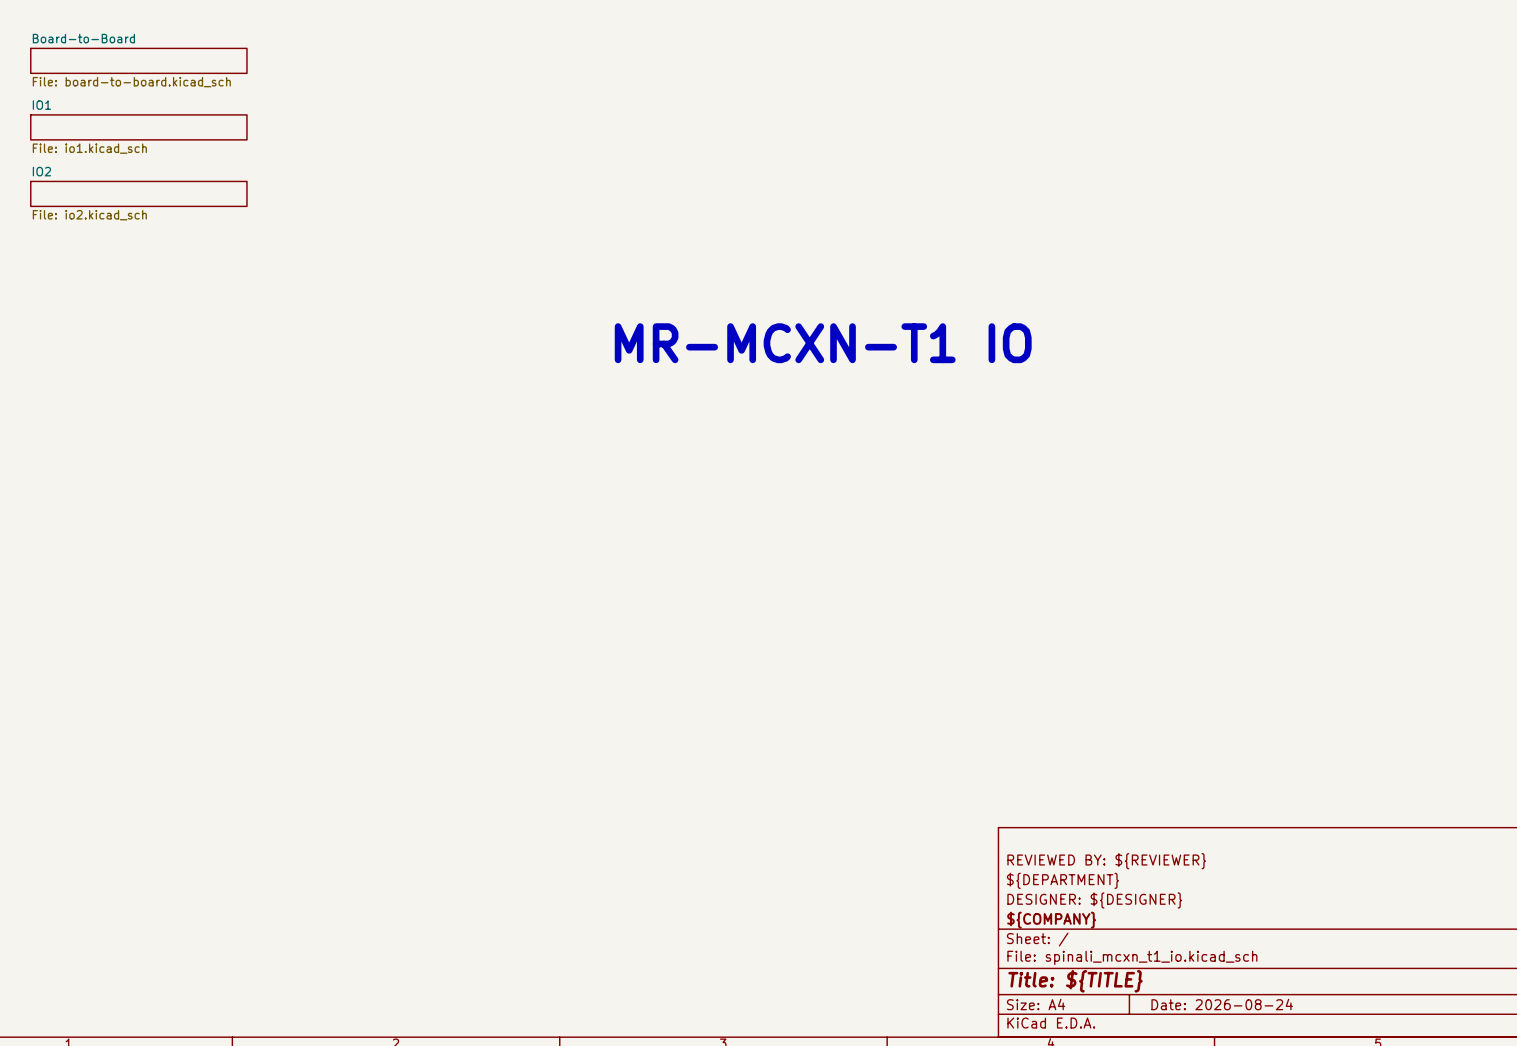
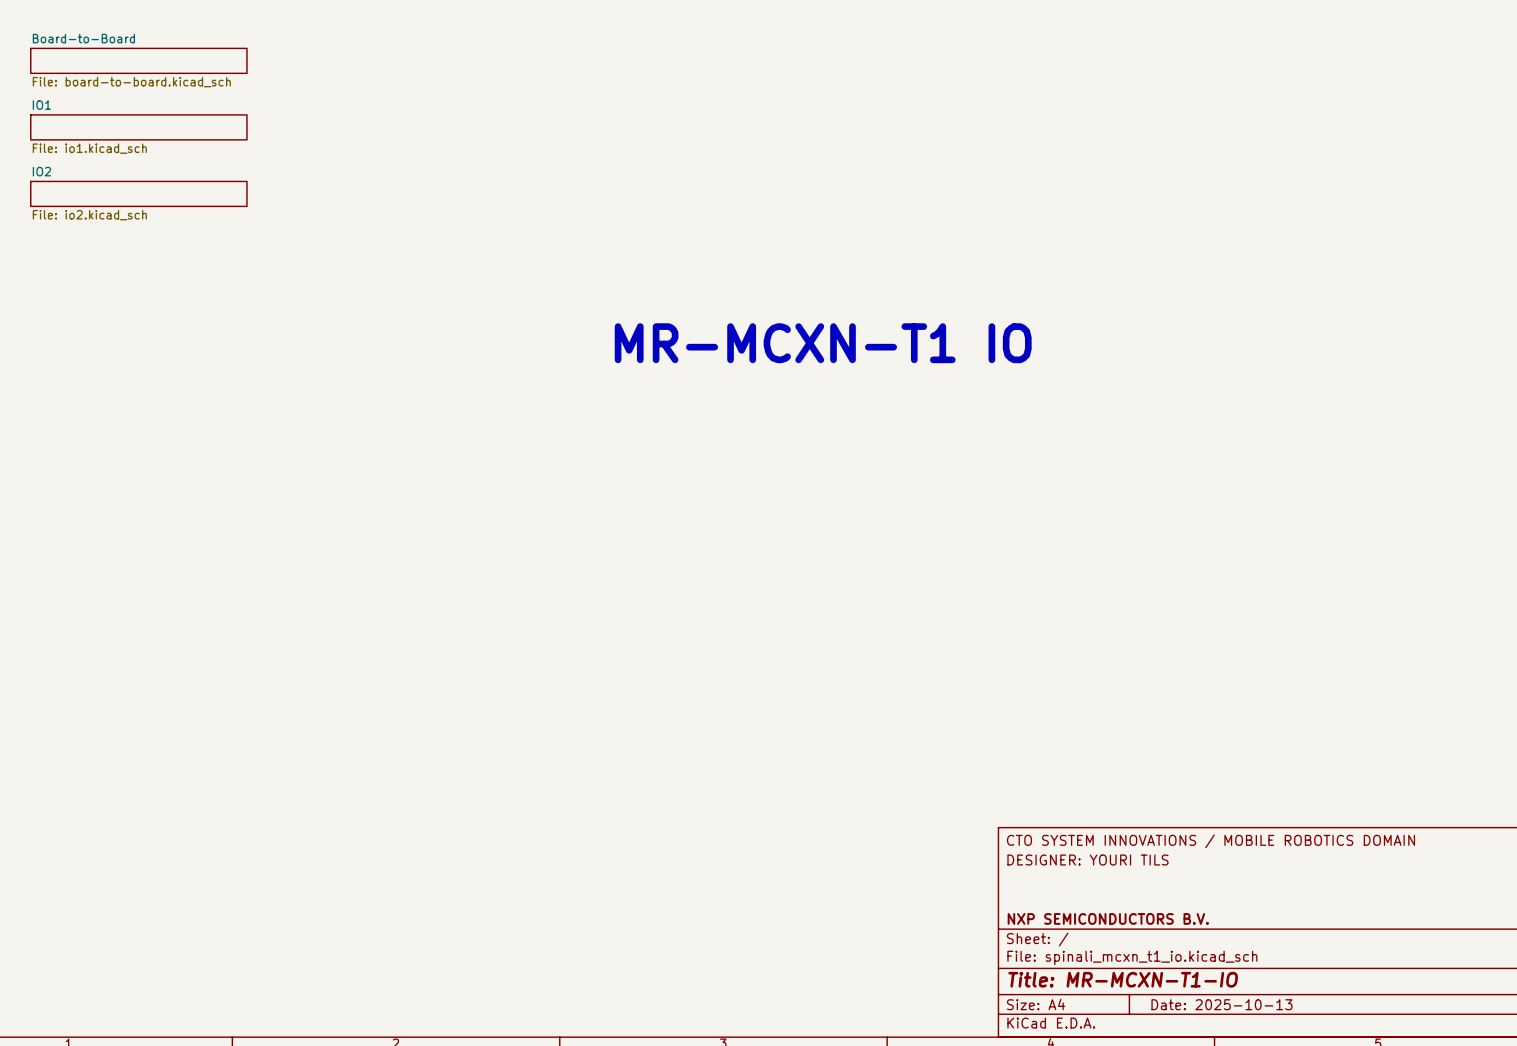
title block: none -> CTO SYSTEM INNOVATIONS / MOBILE ROBOTICS DOMAIN (1210, 841)
title block: REVIEWED BY: ${REVIEWER} (1106, 861) -> DESIGNER: YOURI TILS (1087, 860)
title block: ${DEPARTMENT} (1062, 880) -> none
title block: DESIGNER: ${DESIGNER} (1094, 900) -> none
title block: ${COMPANY} (1051, 920) -> NXP SEMICONDUCTORS B.V. (1108, 918)
title block: Title: ${TITLE} (1075, 981) -> Title: MR-MCXN-T1-IO (1123, 979)
title block: Date: 2026-08-24 (1222, 1004) -> Date: 2025-10-13 (1221, 1004)

